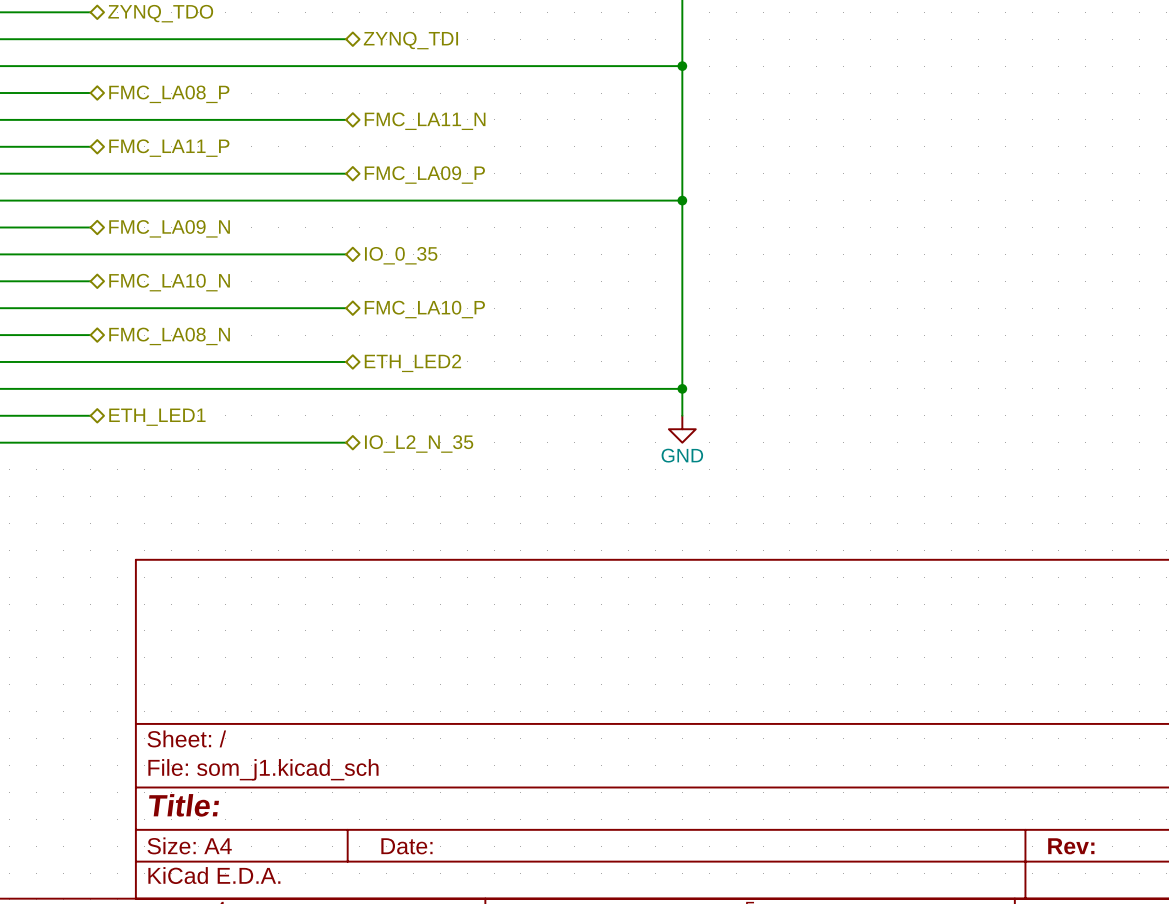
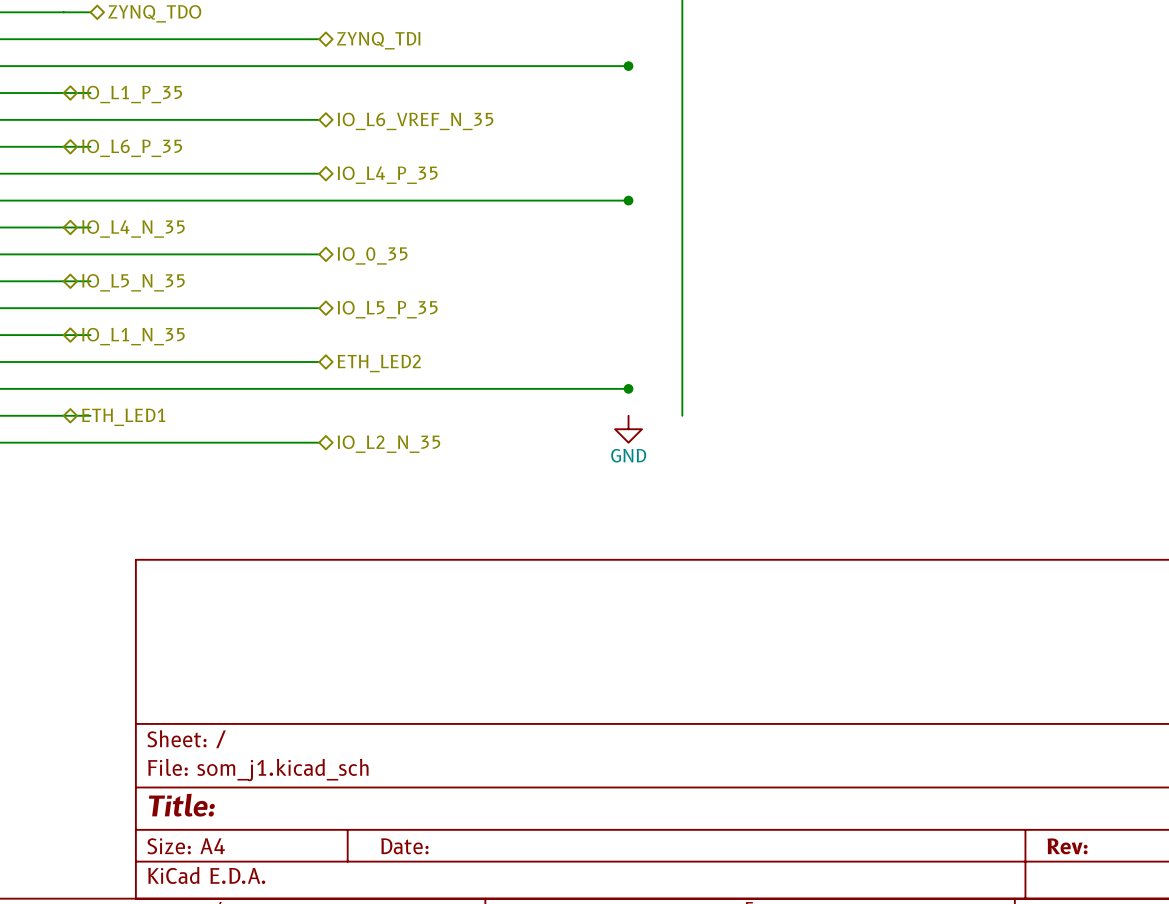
wire: (319, 39) (346, 39) -> none
hierarchical label position: ZYNQ_TDI (410, 40) -> ZYNQ_TDI (378, 40)
wire: (628, 66) (682, 66) -> none
junction position: (682, 66) -> (628, 66)
hierarchical label: none -> IO_L1_P_35 (132, 94)
hierarchical label: FMC_LA08_P (169, 94) -> none
wire: (319, 119) (346, 119) -> none
hierarchical label: none -> IO_L6_VREF_N_35 (415, 121)
hierarchical label: FMC_LA11_N (425, 121) -> none
hierarchical label: none -> IO_L6_P_35 (132, 148)
hierarchical label: FMC_LA11_P (169, 148) -> none
wire: (319, 173) (346, 173) -> none
hierarchical label: none -> IO_L4_P_35 (387, 175)
hierarchical label: FMC_LA09_P (424, 175) -> none
wire: (628, 200) (682, 200) -> none
junction position: (682, 200) -> (628, 200)
hierarchical label: none -> IO_L4_N_35 (133, 229)
hierarchical label: FMC_LA09_N (169, 228) -> none
wire: (319, 254) (346, 254) -> none
hierarchical label position: IO_0_35 (401, 255) -> IO_0_35 (372, 255)
hierarchical label: none -> IO_L5_N_35 (133, 282)
hierarchical label: FMC_LA10_N (169, 282) -> none
wire: (319, 308) (346, 308) -> none
hierarchical label: none -> IO_L5_P_35 (387, 309)
hierarchical label: FMC_LA10_P (424, 309) -> none
hierarchical label: none -> IO_L1_N_35 (133, 336)
hierarchical label: FMC_LA08_N (169, 336) -> none
wire: (319, 361) (346, 361) -> none
hierarchical label position: ETH_LED2 (412, 363) -> ETH_LED2 (379, 363)
wire: (628, 388) (682, 388) -> none
junction position: (682, 388) -> (628, 388)
hierarchical label position: ETH_LED1 (157, 417) -> ETH_LED1 (123, 417)
power symbol position: GND (682, 429) -> GND (628, 429)
wire: (319, 442) (346, 442) -> none
hierarchical label position: IO_L2_N_35 (419, 444) -> IO_L2_N_35 (388, 444)

